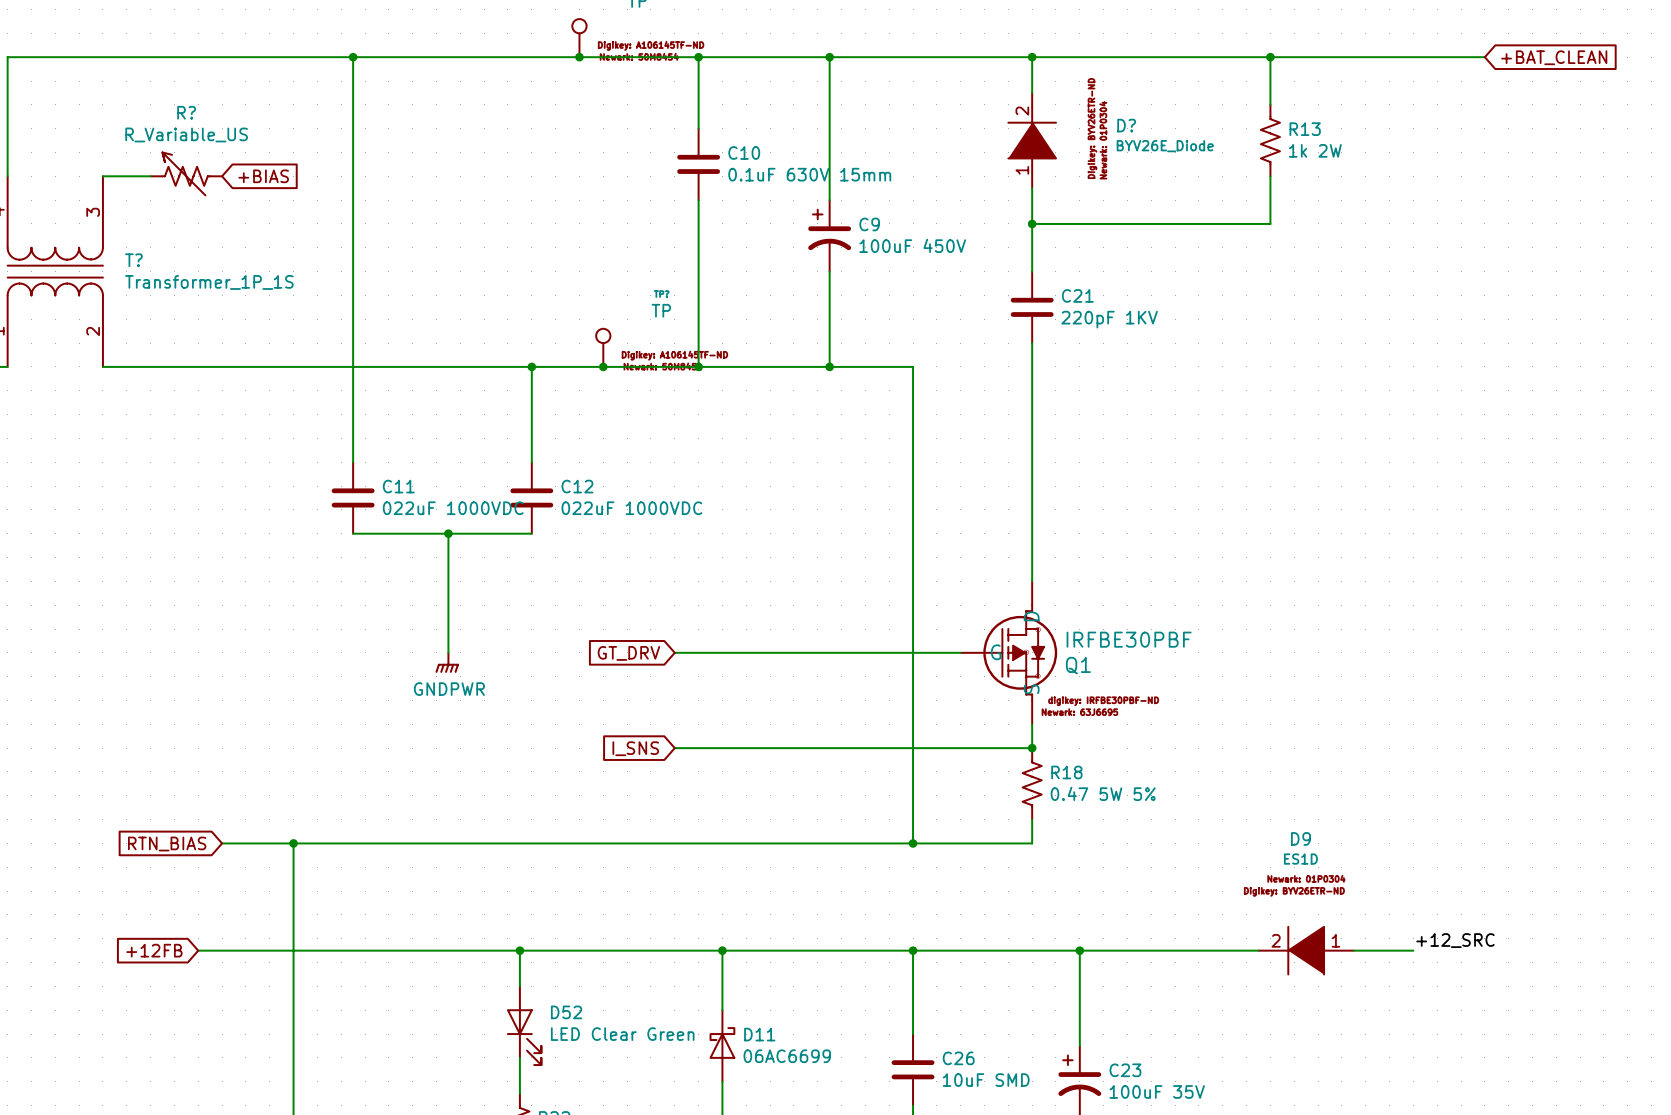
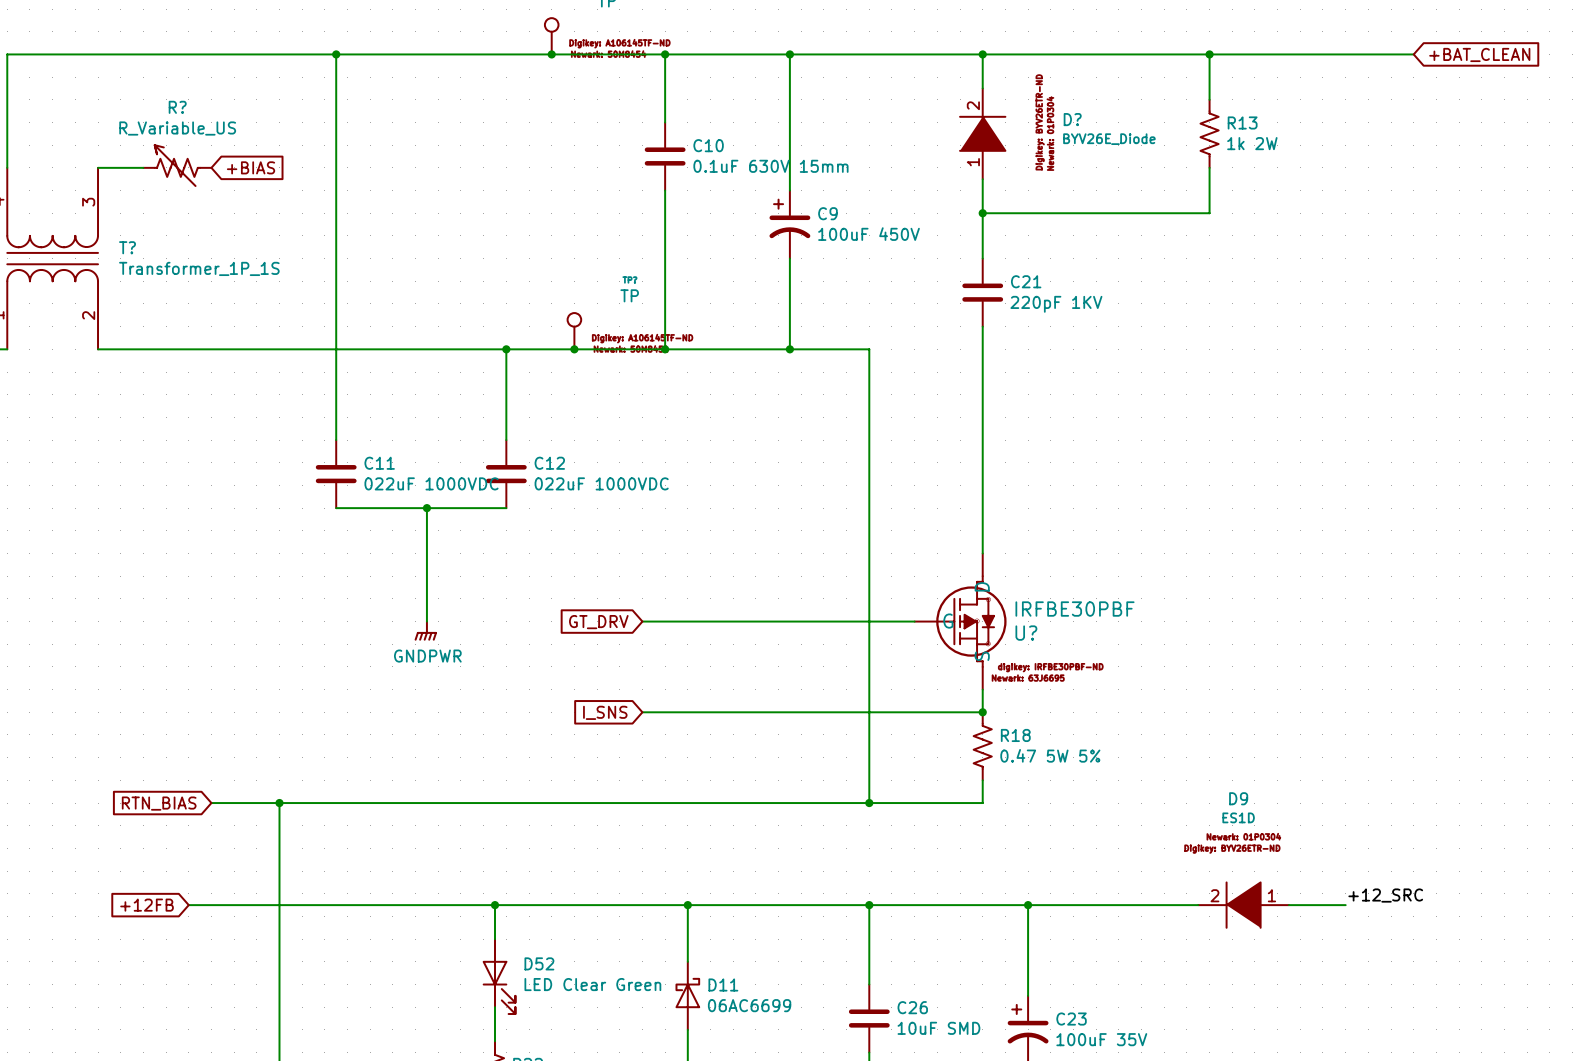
Q1 name: Q1 (1078, 665) -> U? (1026, 633)

